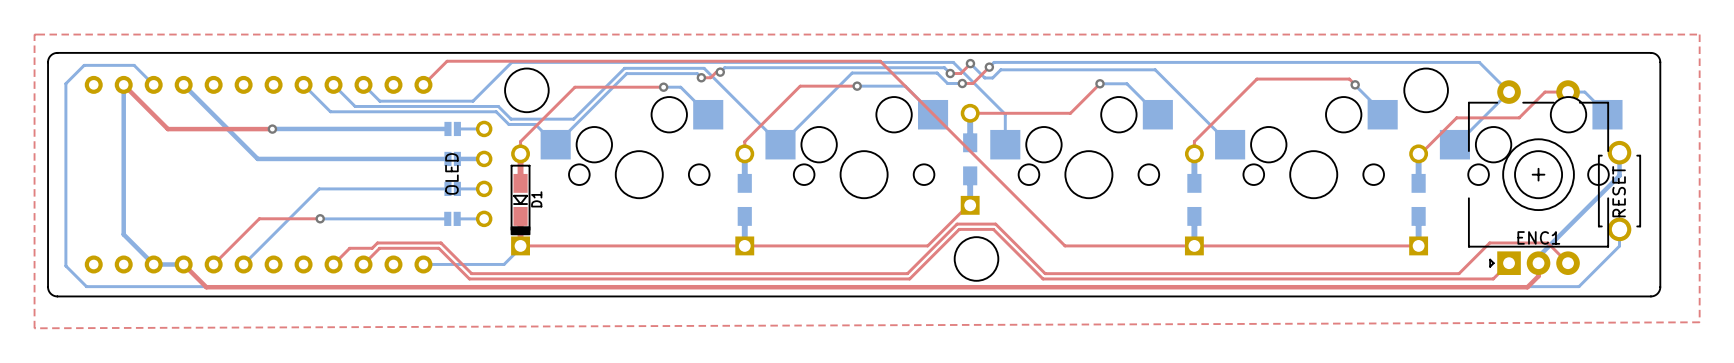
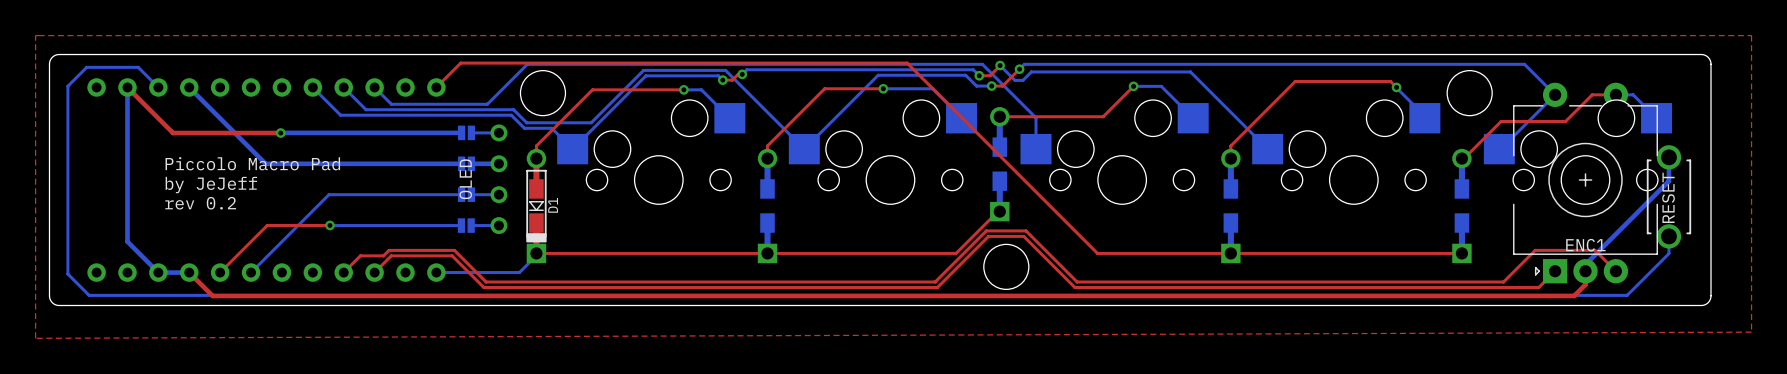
text: none -> Piccolo Macro Pad (252, 163)
text: none -> by JeJeff (211, 185)
text: none -> rev 0.2 (200, 203)

